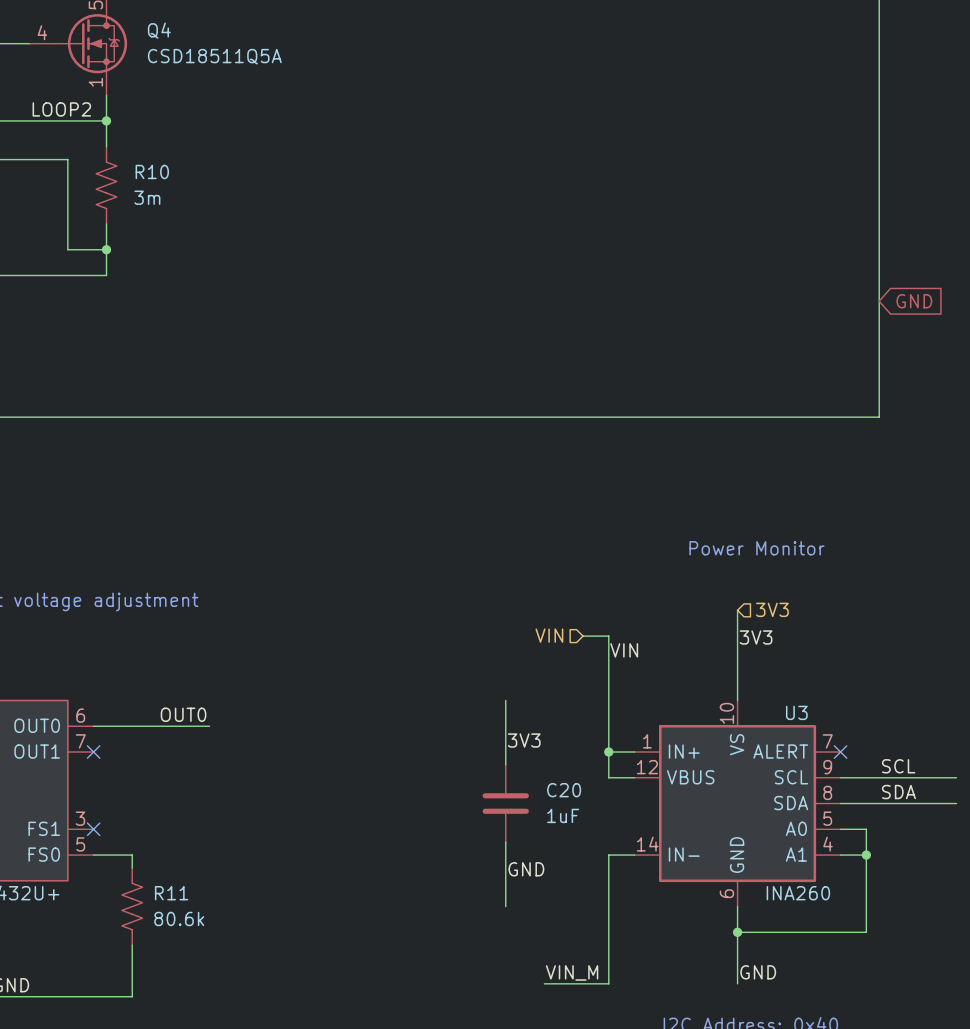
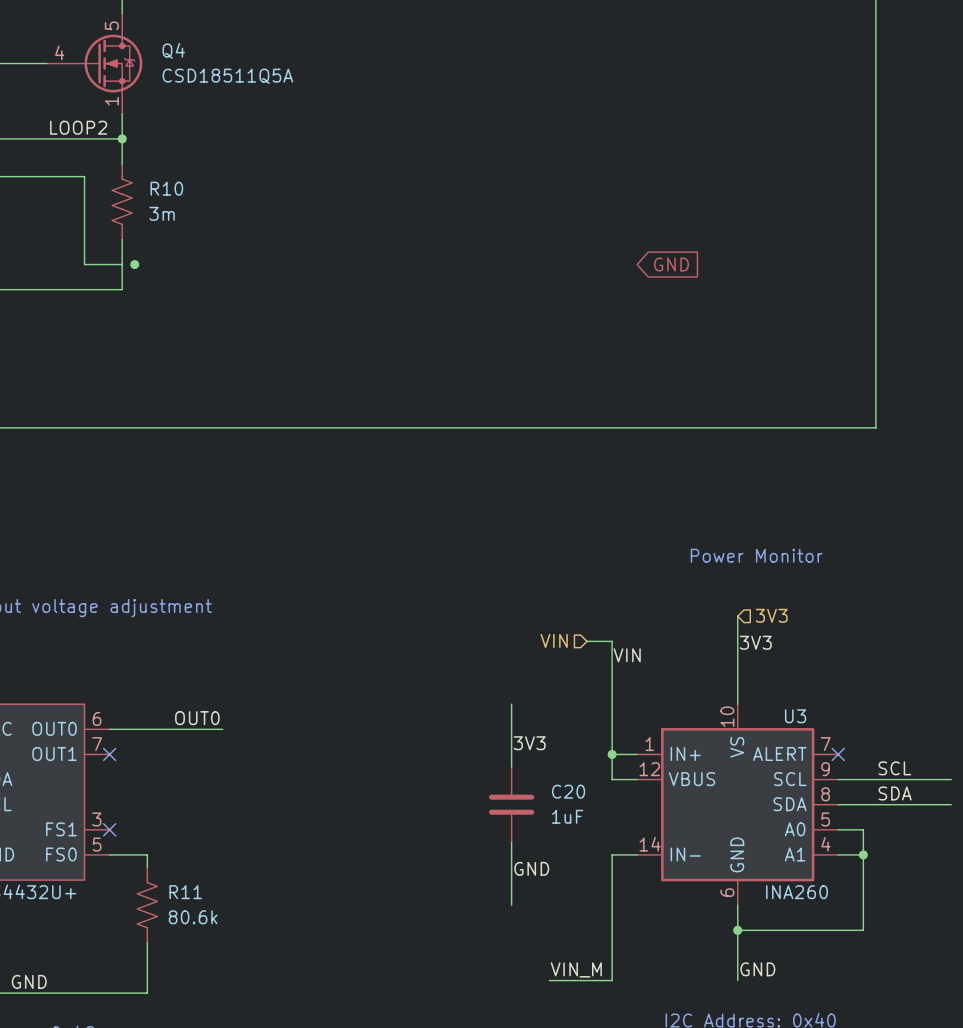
junction position: (106, 249) -> (134, 264)
global label position: GND (914, 301) -> GND (671, 264)

